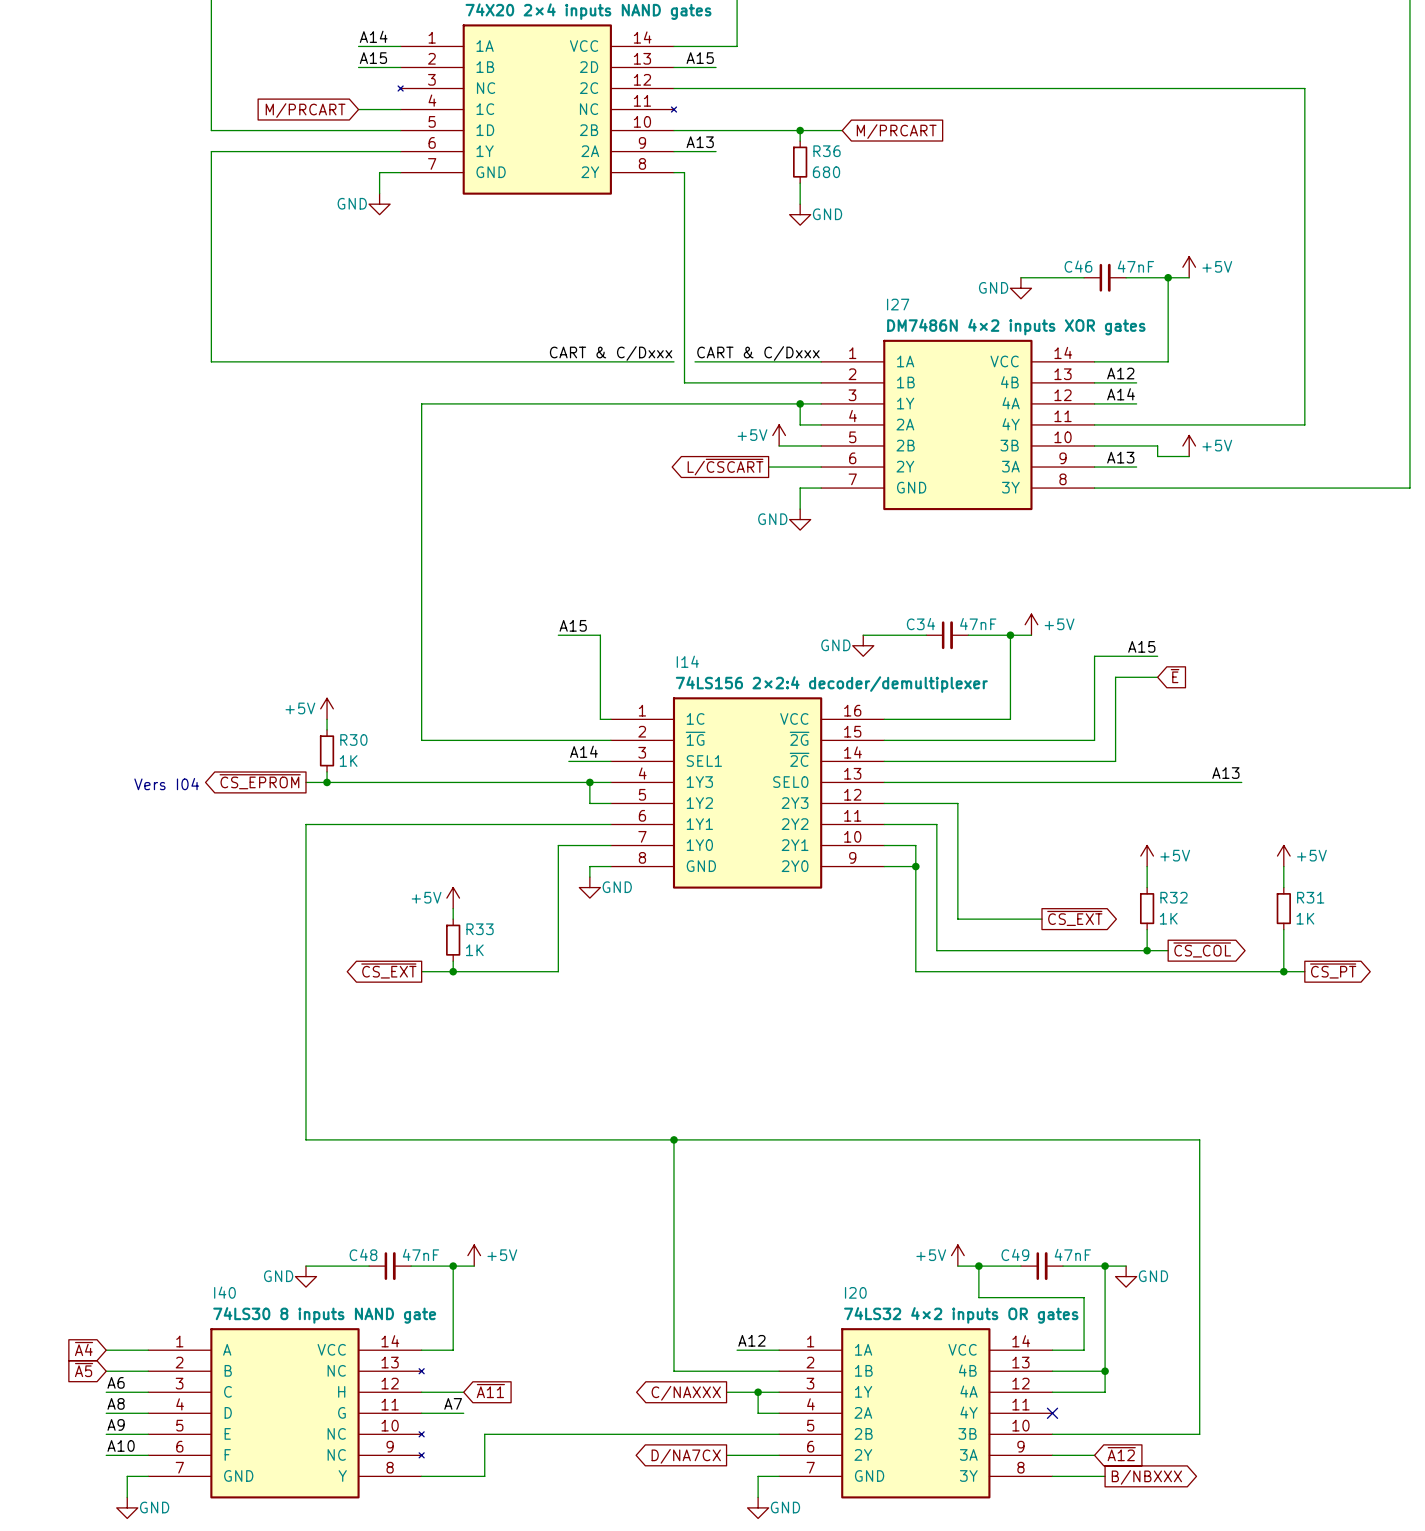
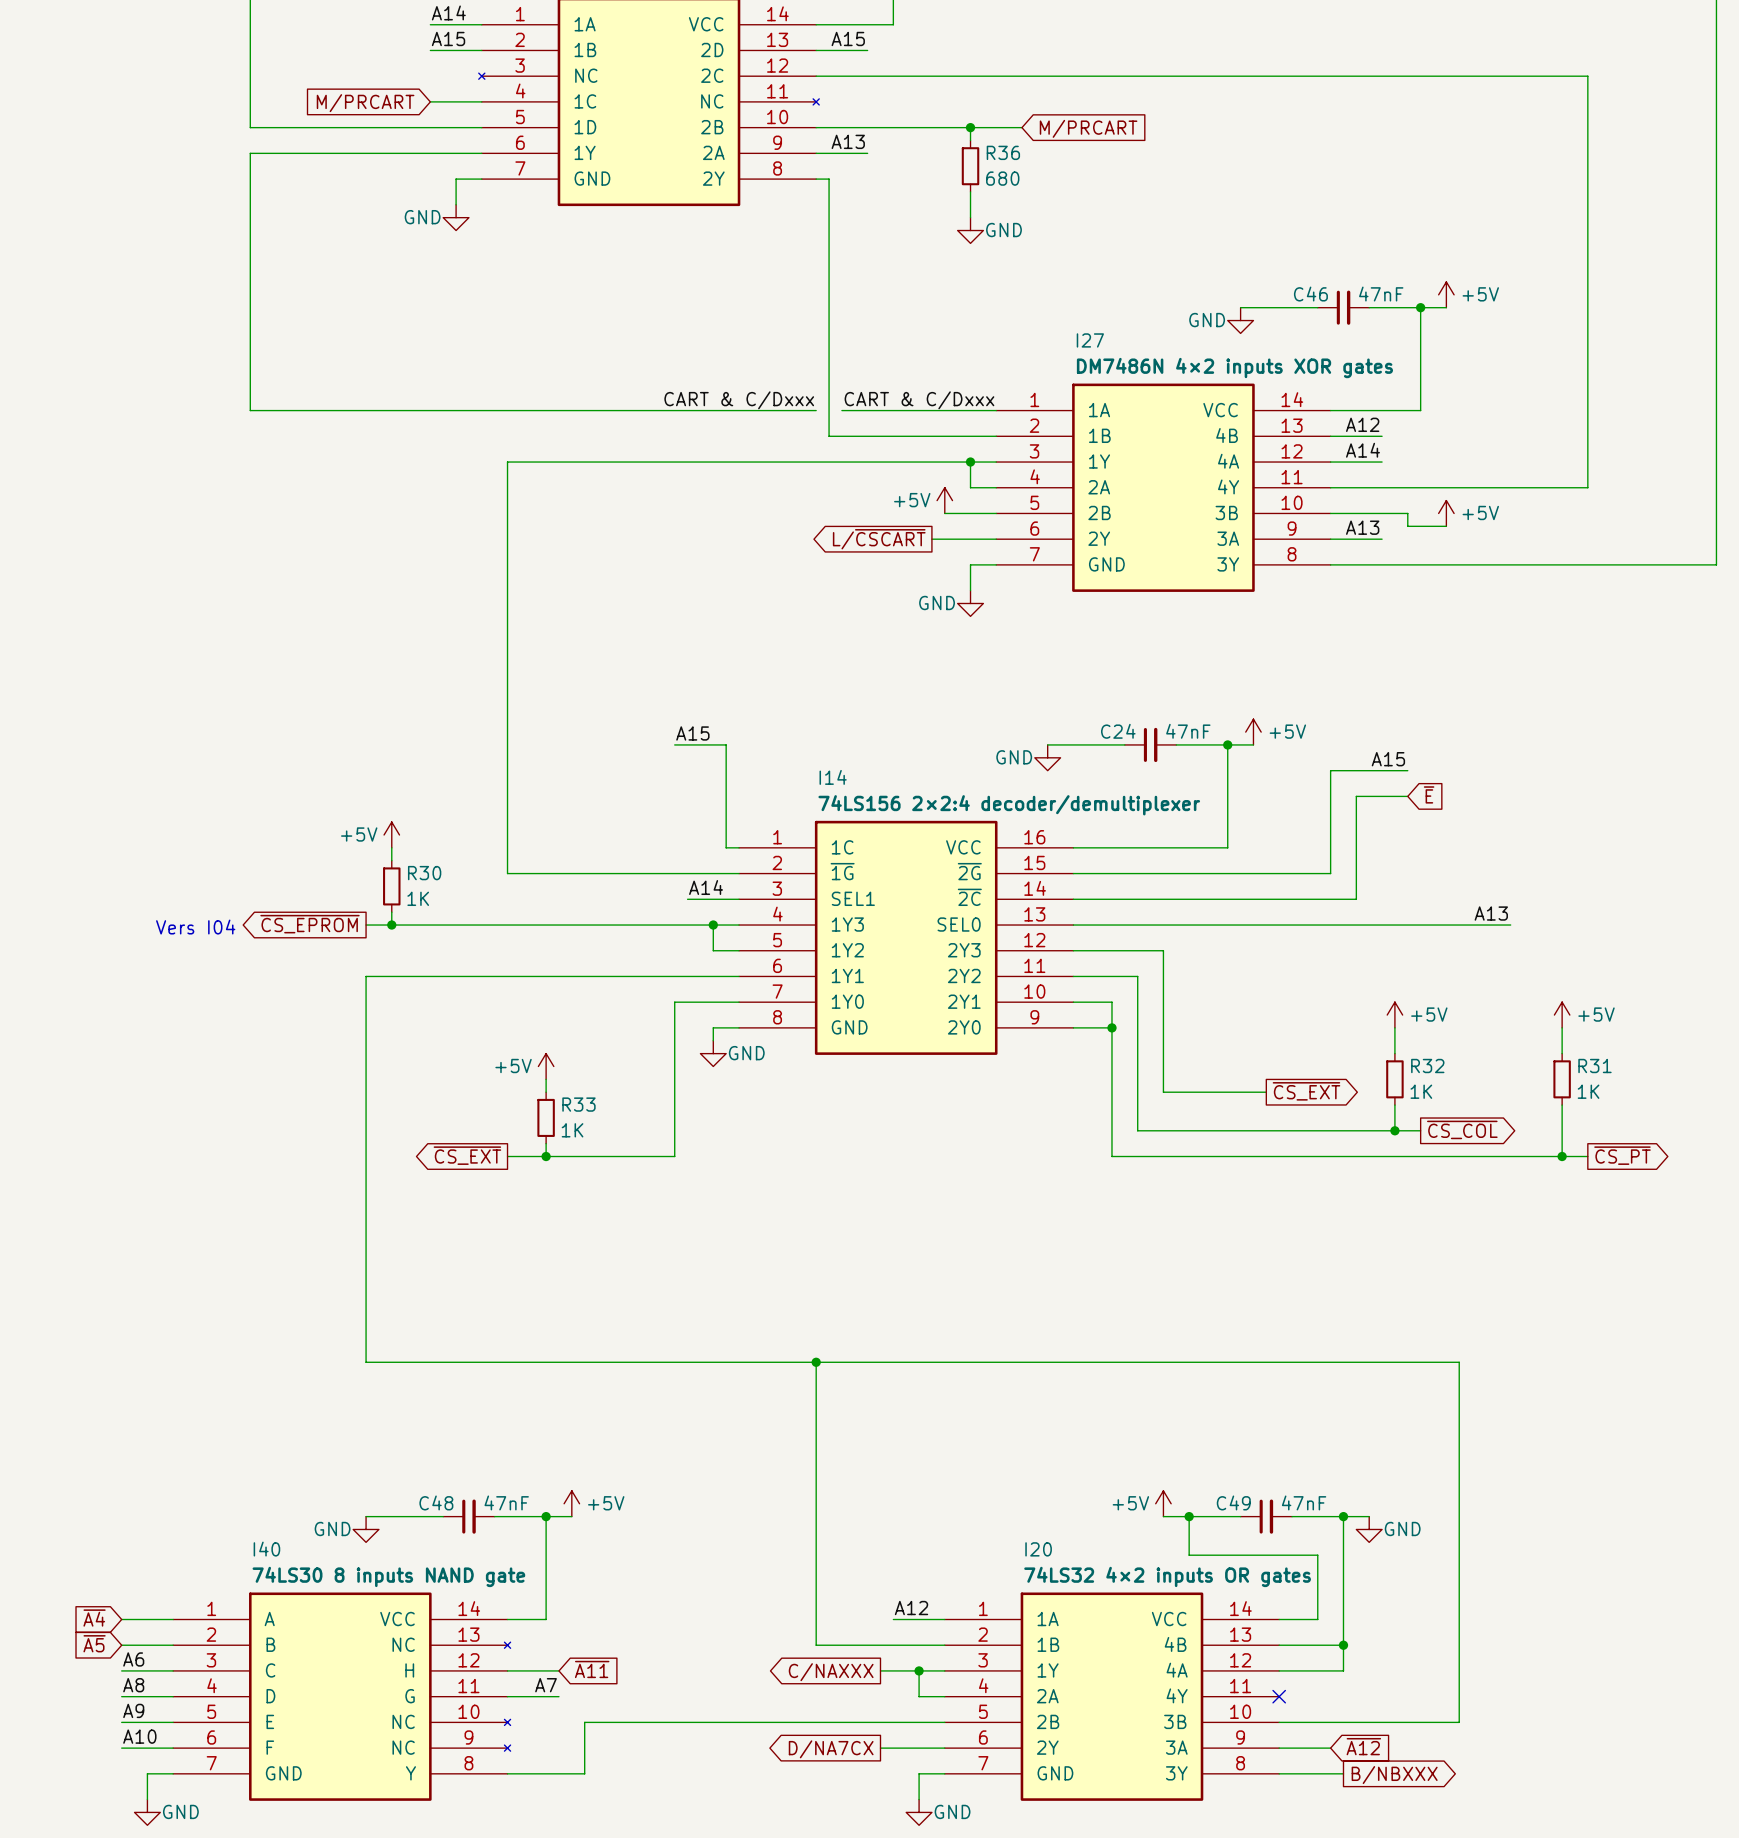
C34 name: C34 (920, 624) -> C24 (1118, 731)

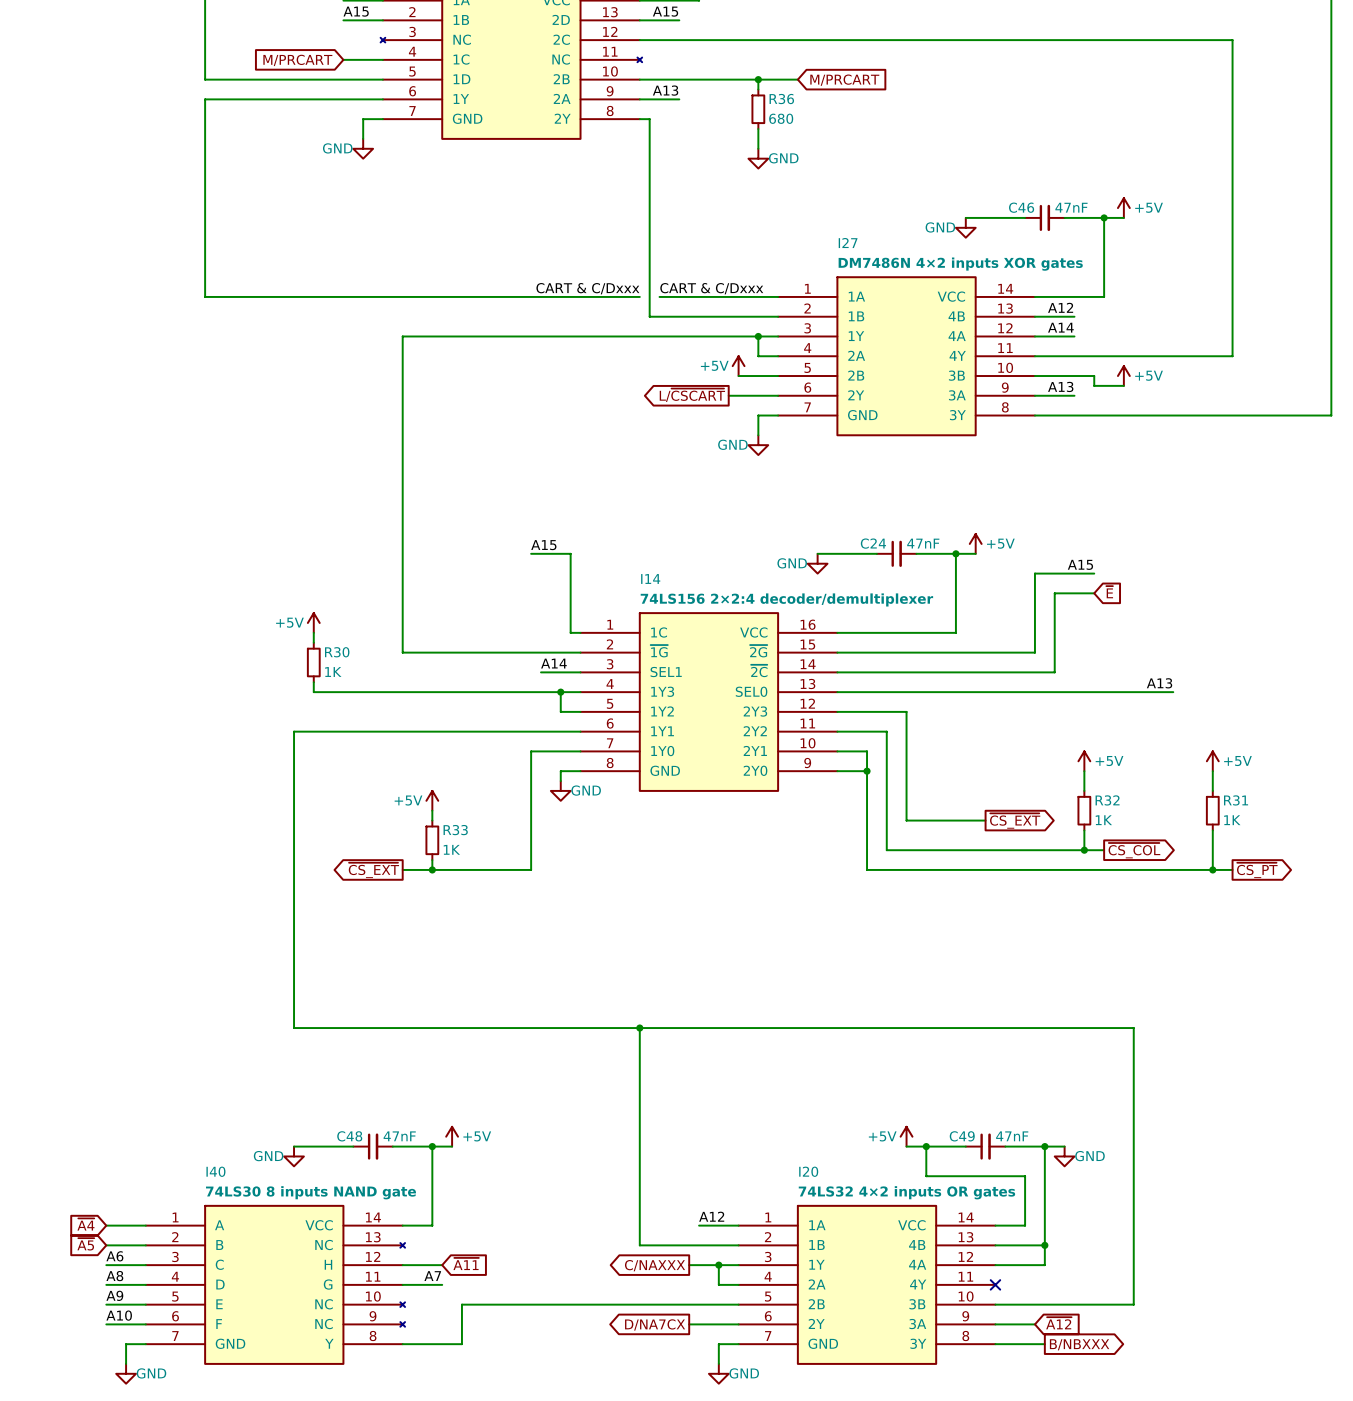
global label: ~{CS_EPROM} (309, 924) -> none
wire: (366, 925) (391, 925) -> none
junction: (391, 925) -> none
text: Vers I04 (195, 927) -> none

